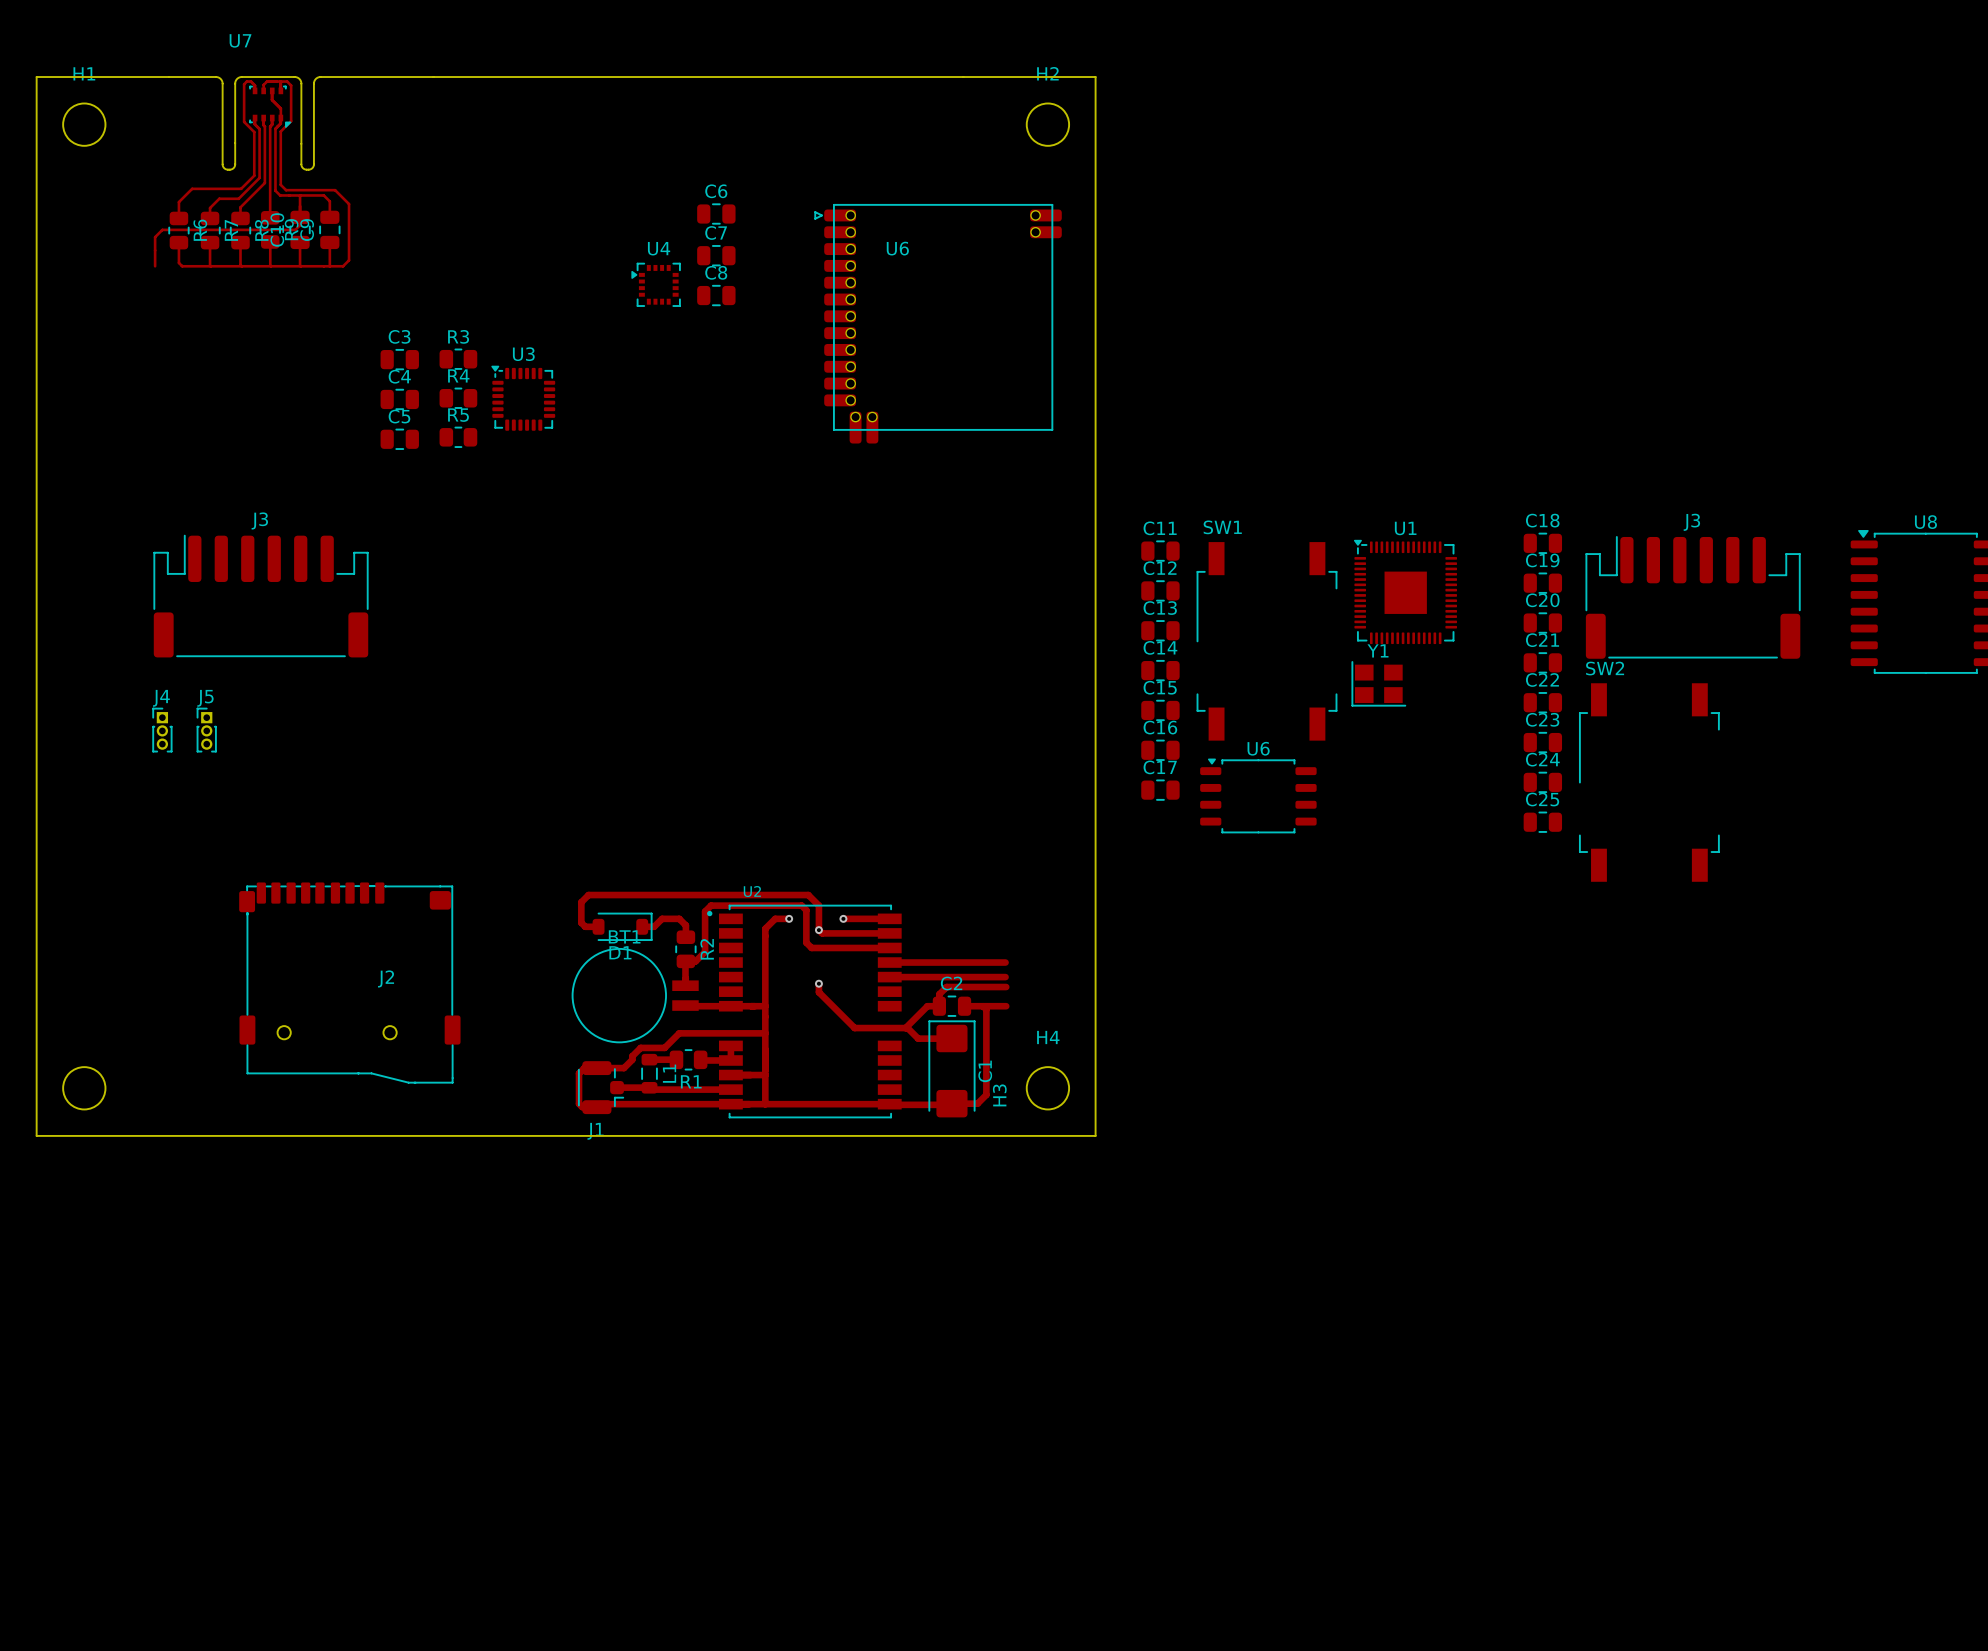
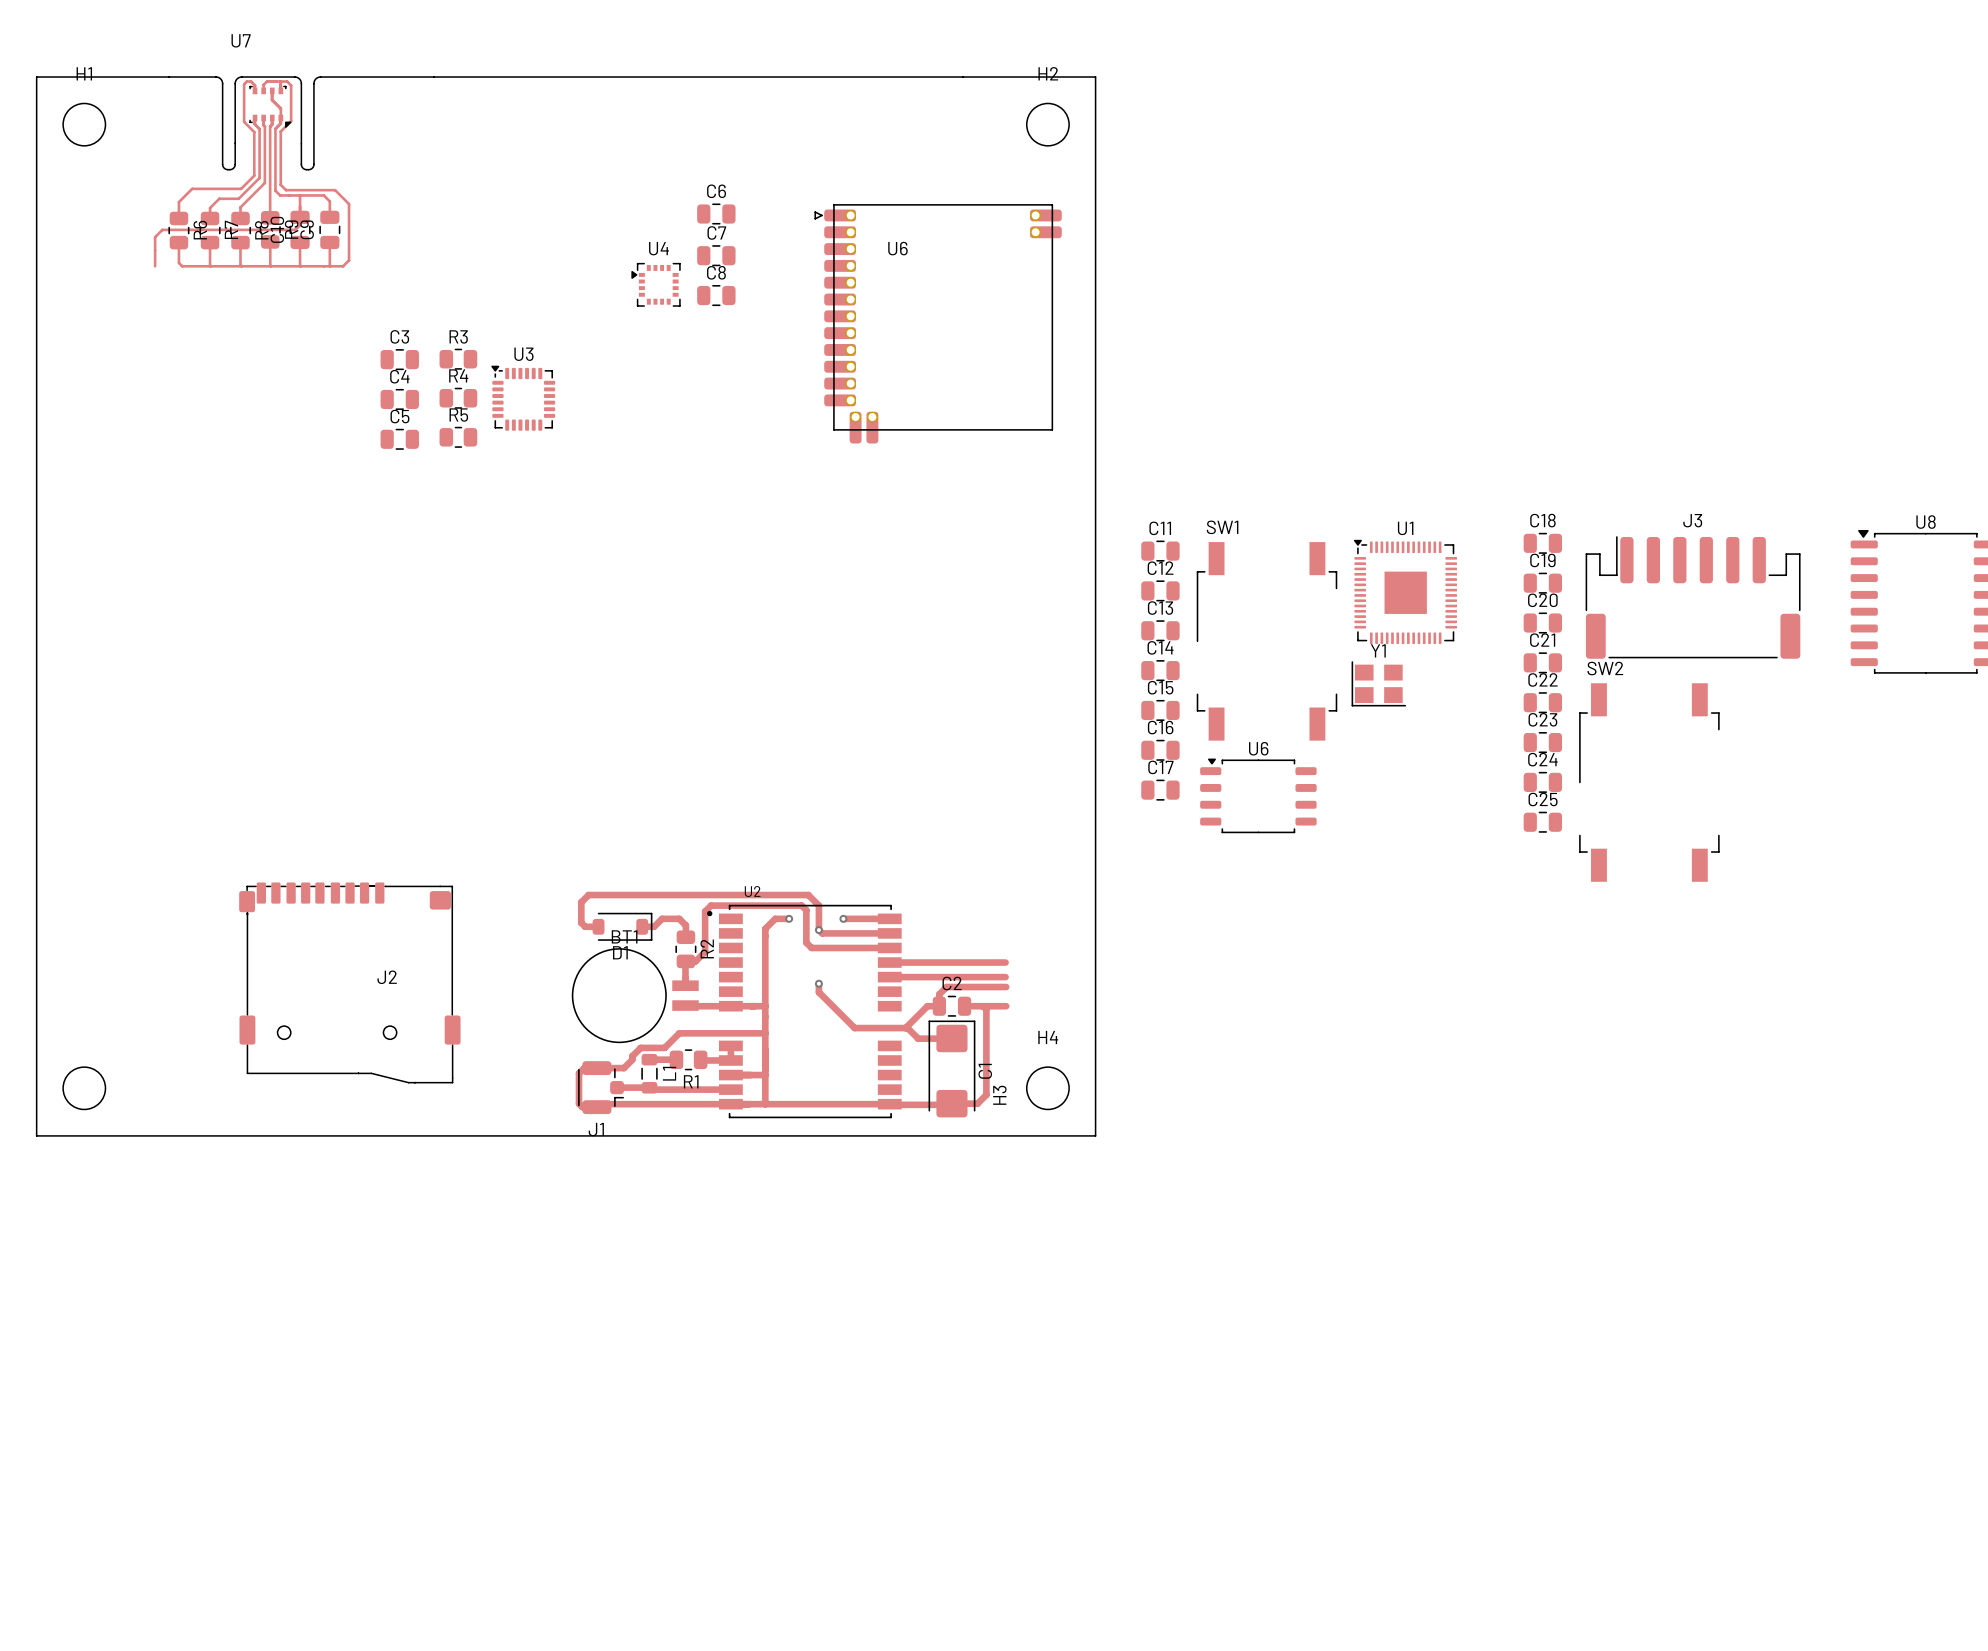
J3: (261, 596) -> none
J4: (162, 730) -> none
J5: (206, 730) -> none

